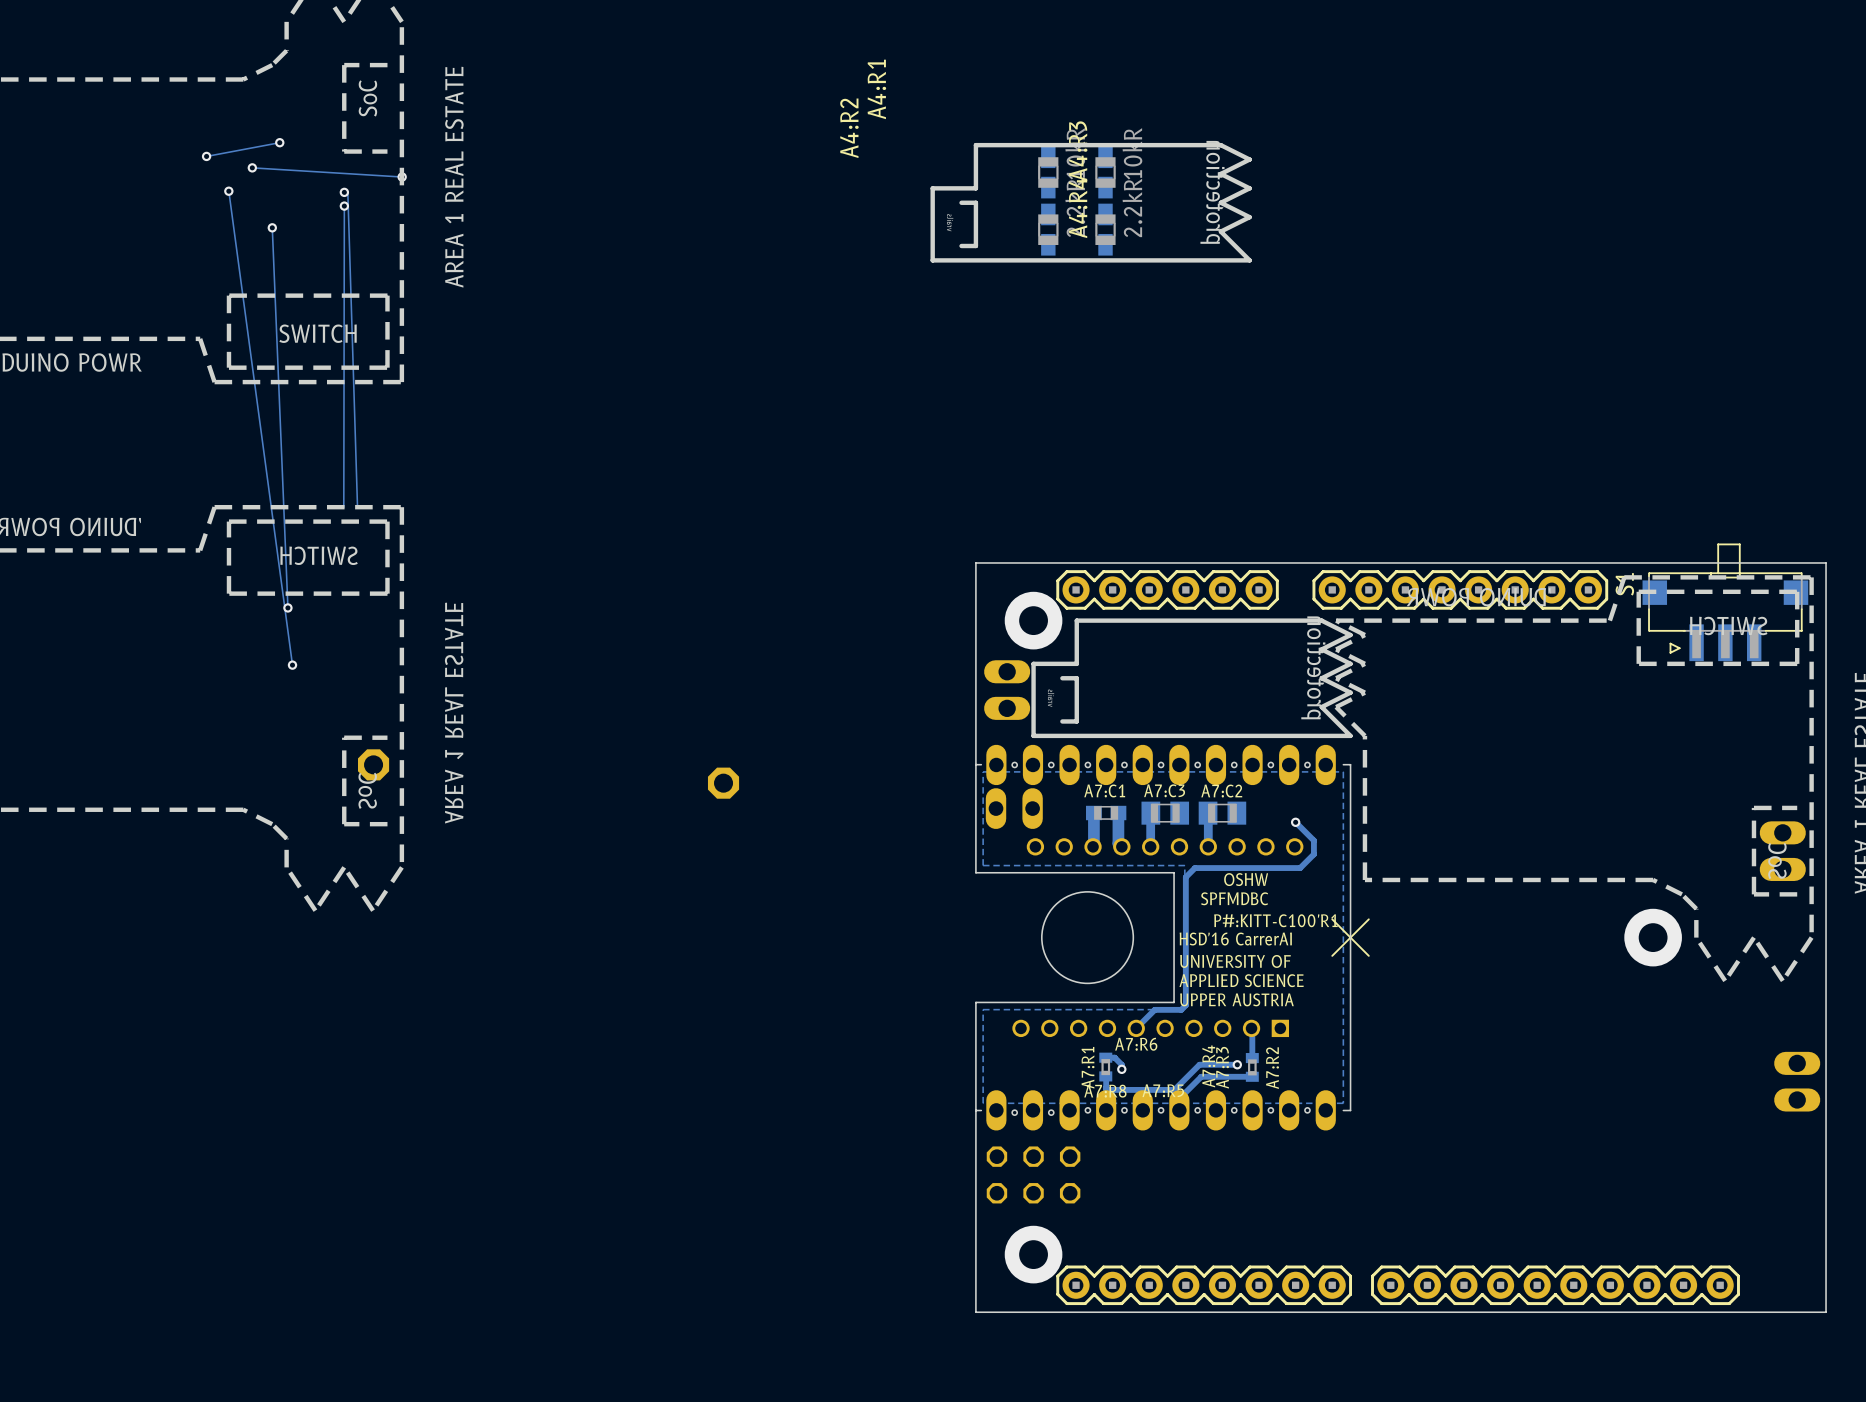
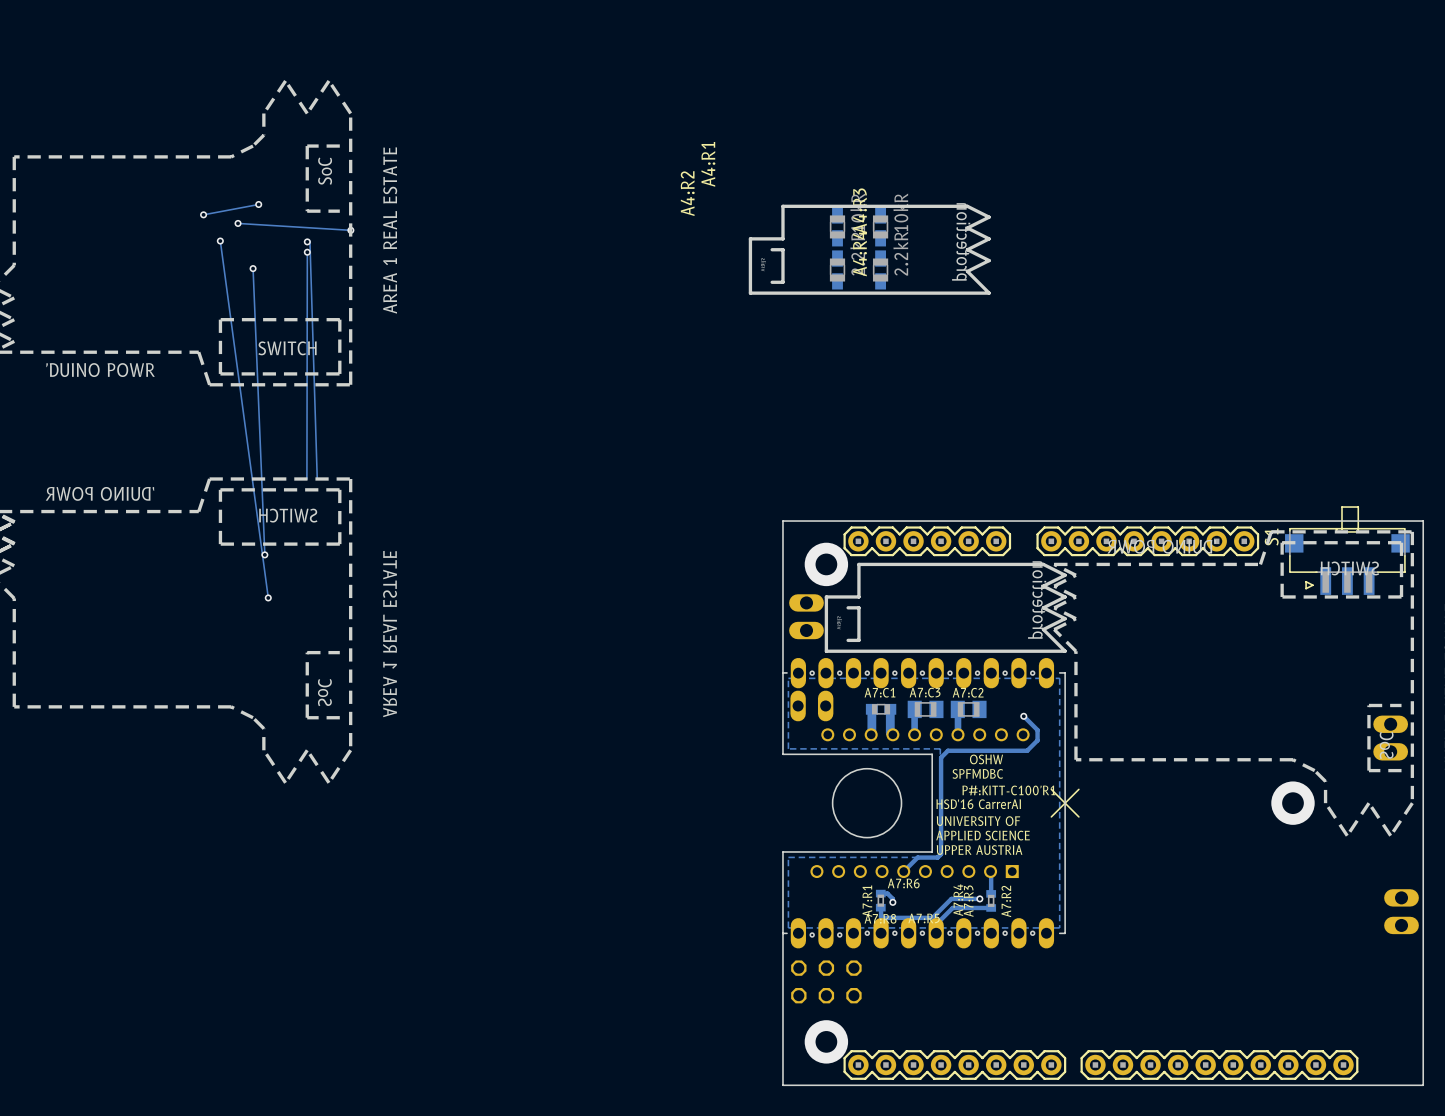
part: (373, 764) -> none
part: (723, 783) -> none

